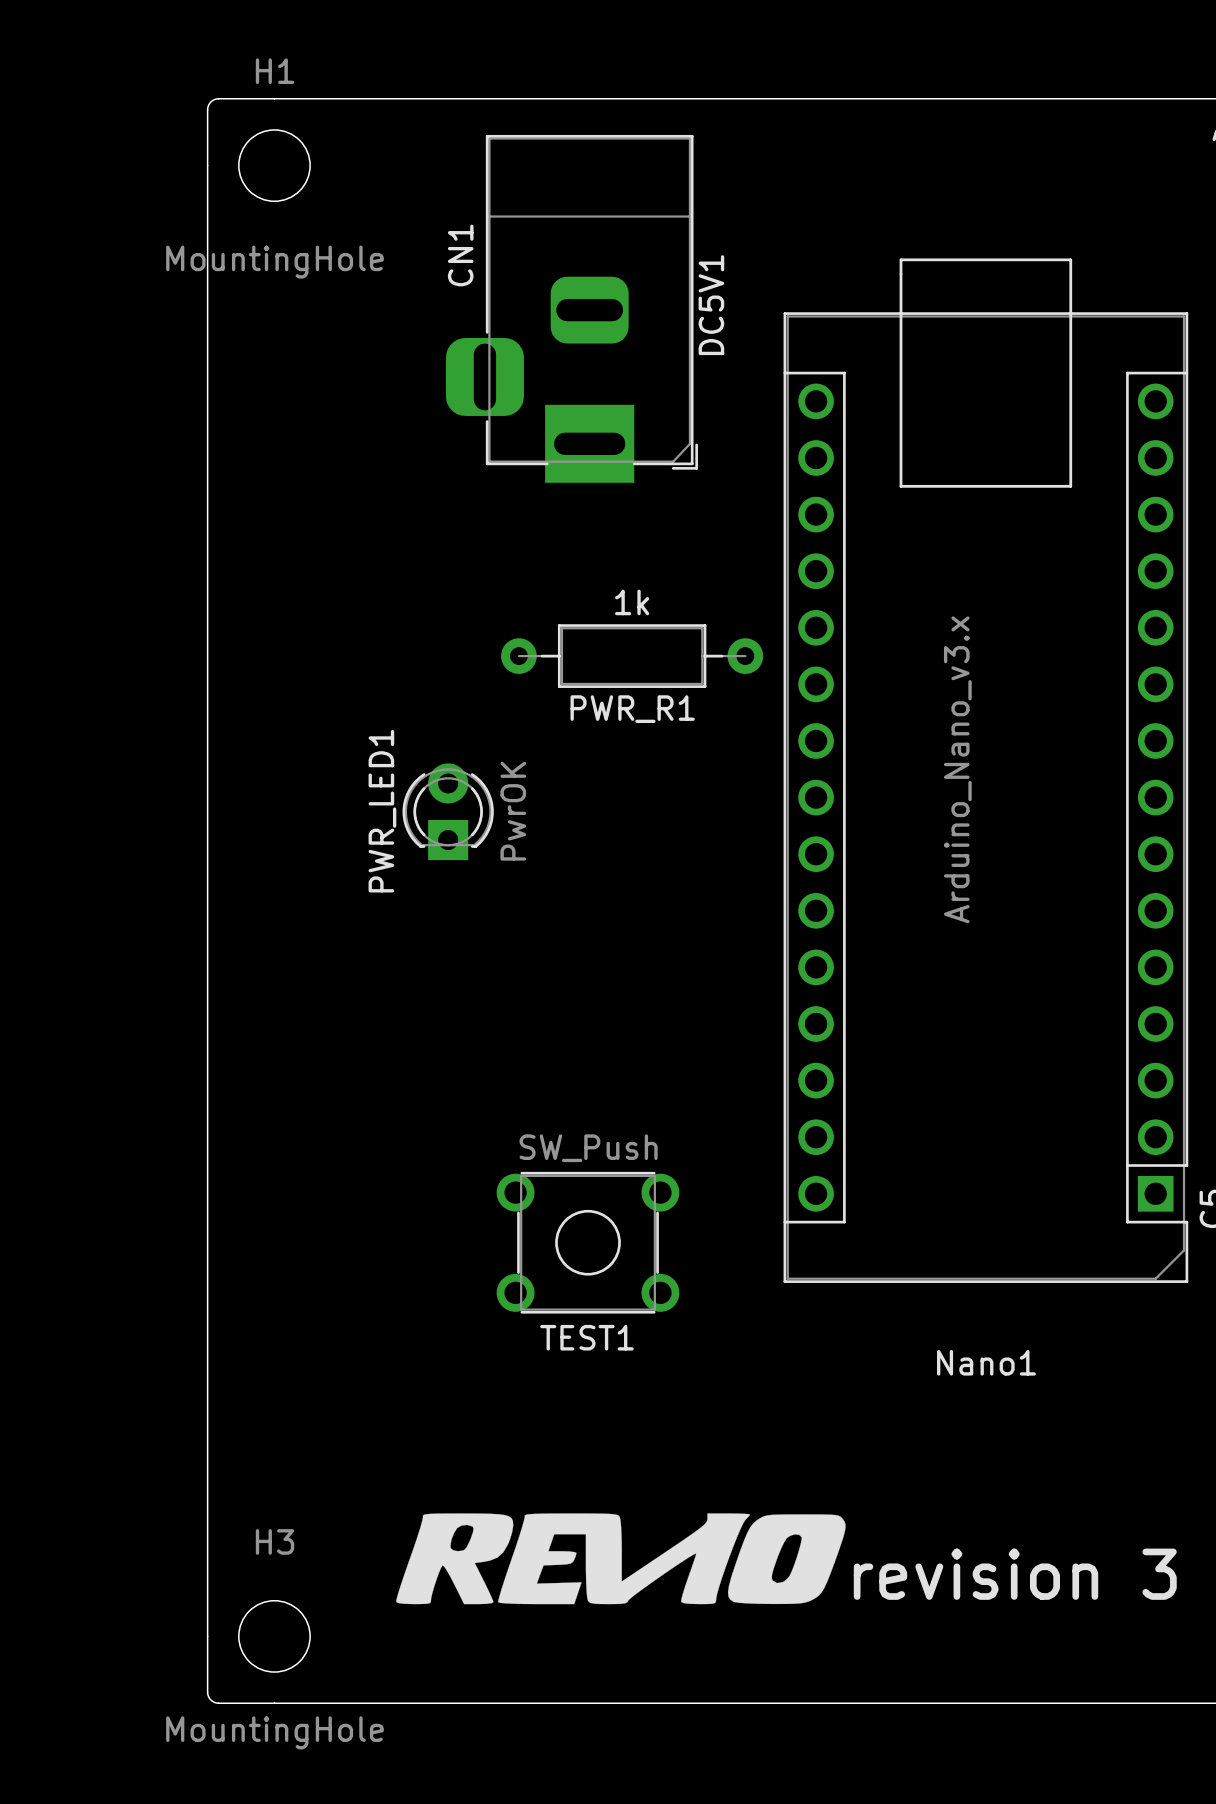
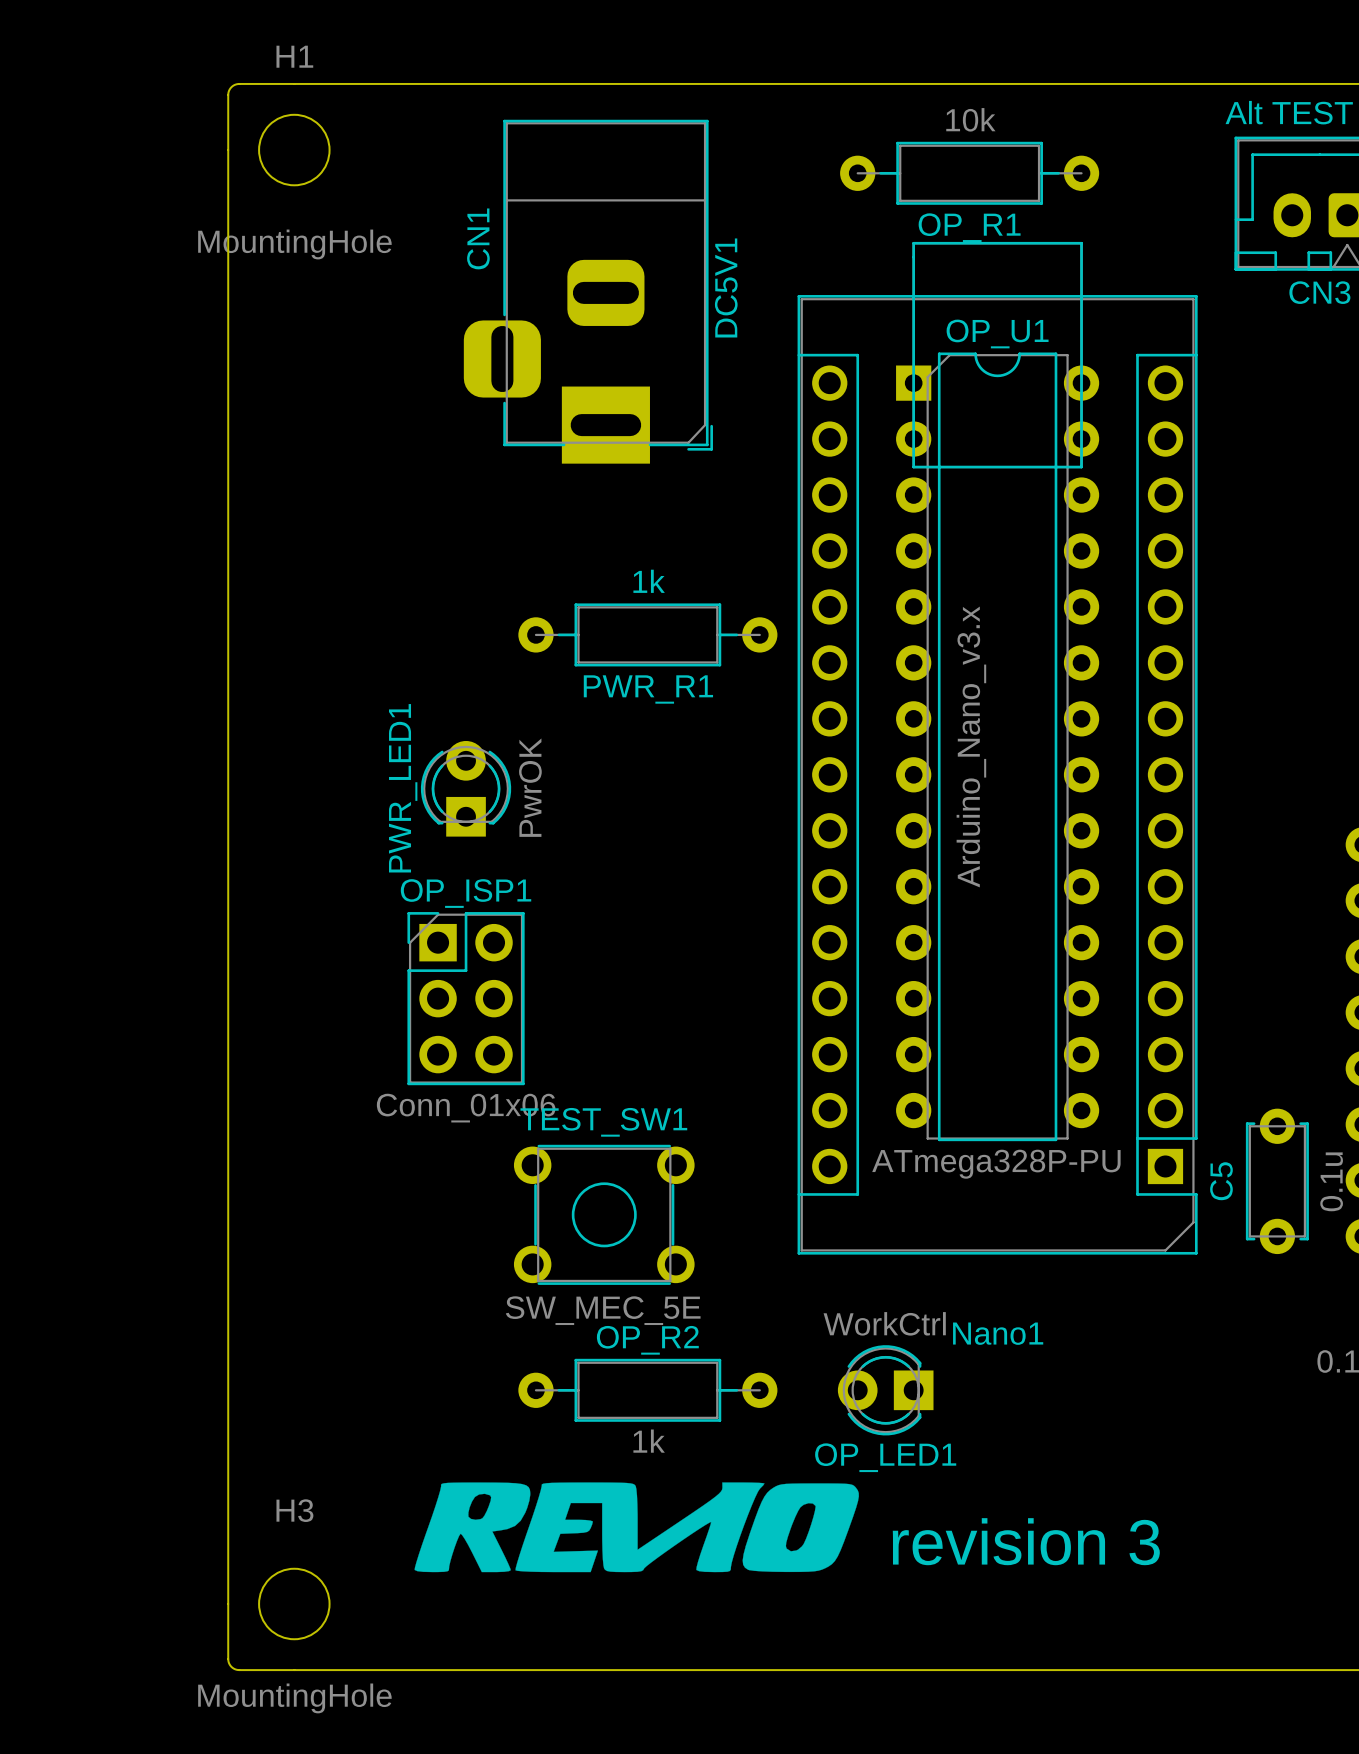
OP_R1: none -> 10k (969, 173)
OP_U1: none -> ATmega328P-PU (997, 746)
OP_ISP1: none -> Conn_01x06 (466, 998)
TEST1 value: SW_Push (588, 1148) -> SW_MEC_5E (603, 1310)
TEST1 name: TEST1 (586, 1337) -> TEST_SW1 (603, 1122)
OP_R2: none -> 1k (647, 1390)
OP_LED1: none -> WorkCtrl (885, 1390)

